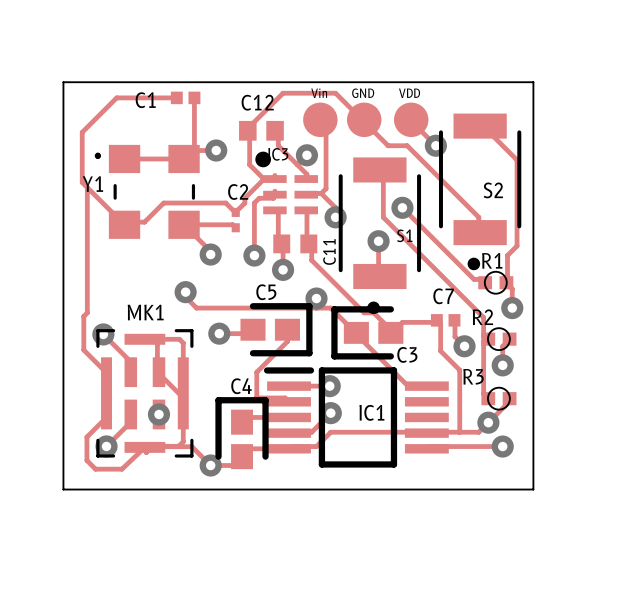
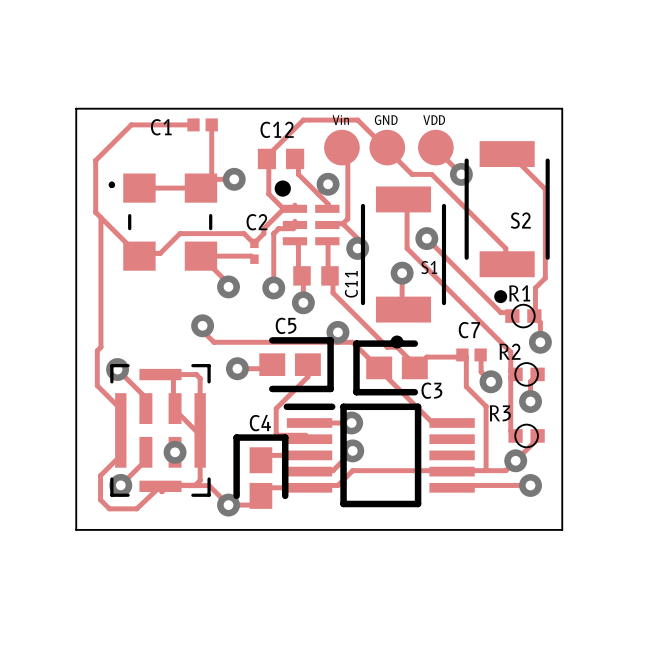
text: IC3 (278, 154) -> none
text: Y1 (92, 184) -> none
text: MK1 (145, 312) -> none
text: IC1 (371, 412) -> none

